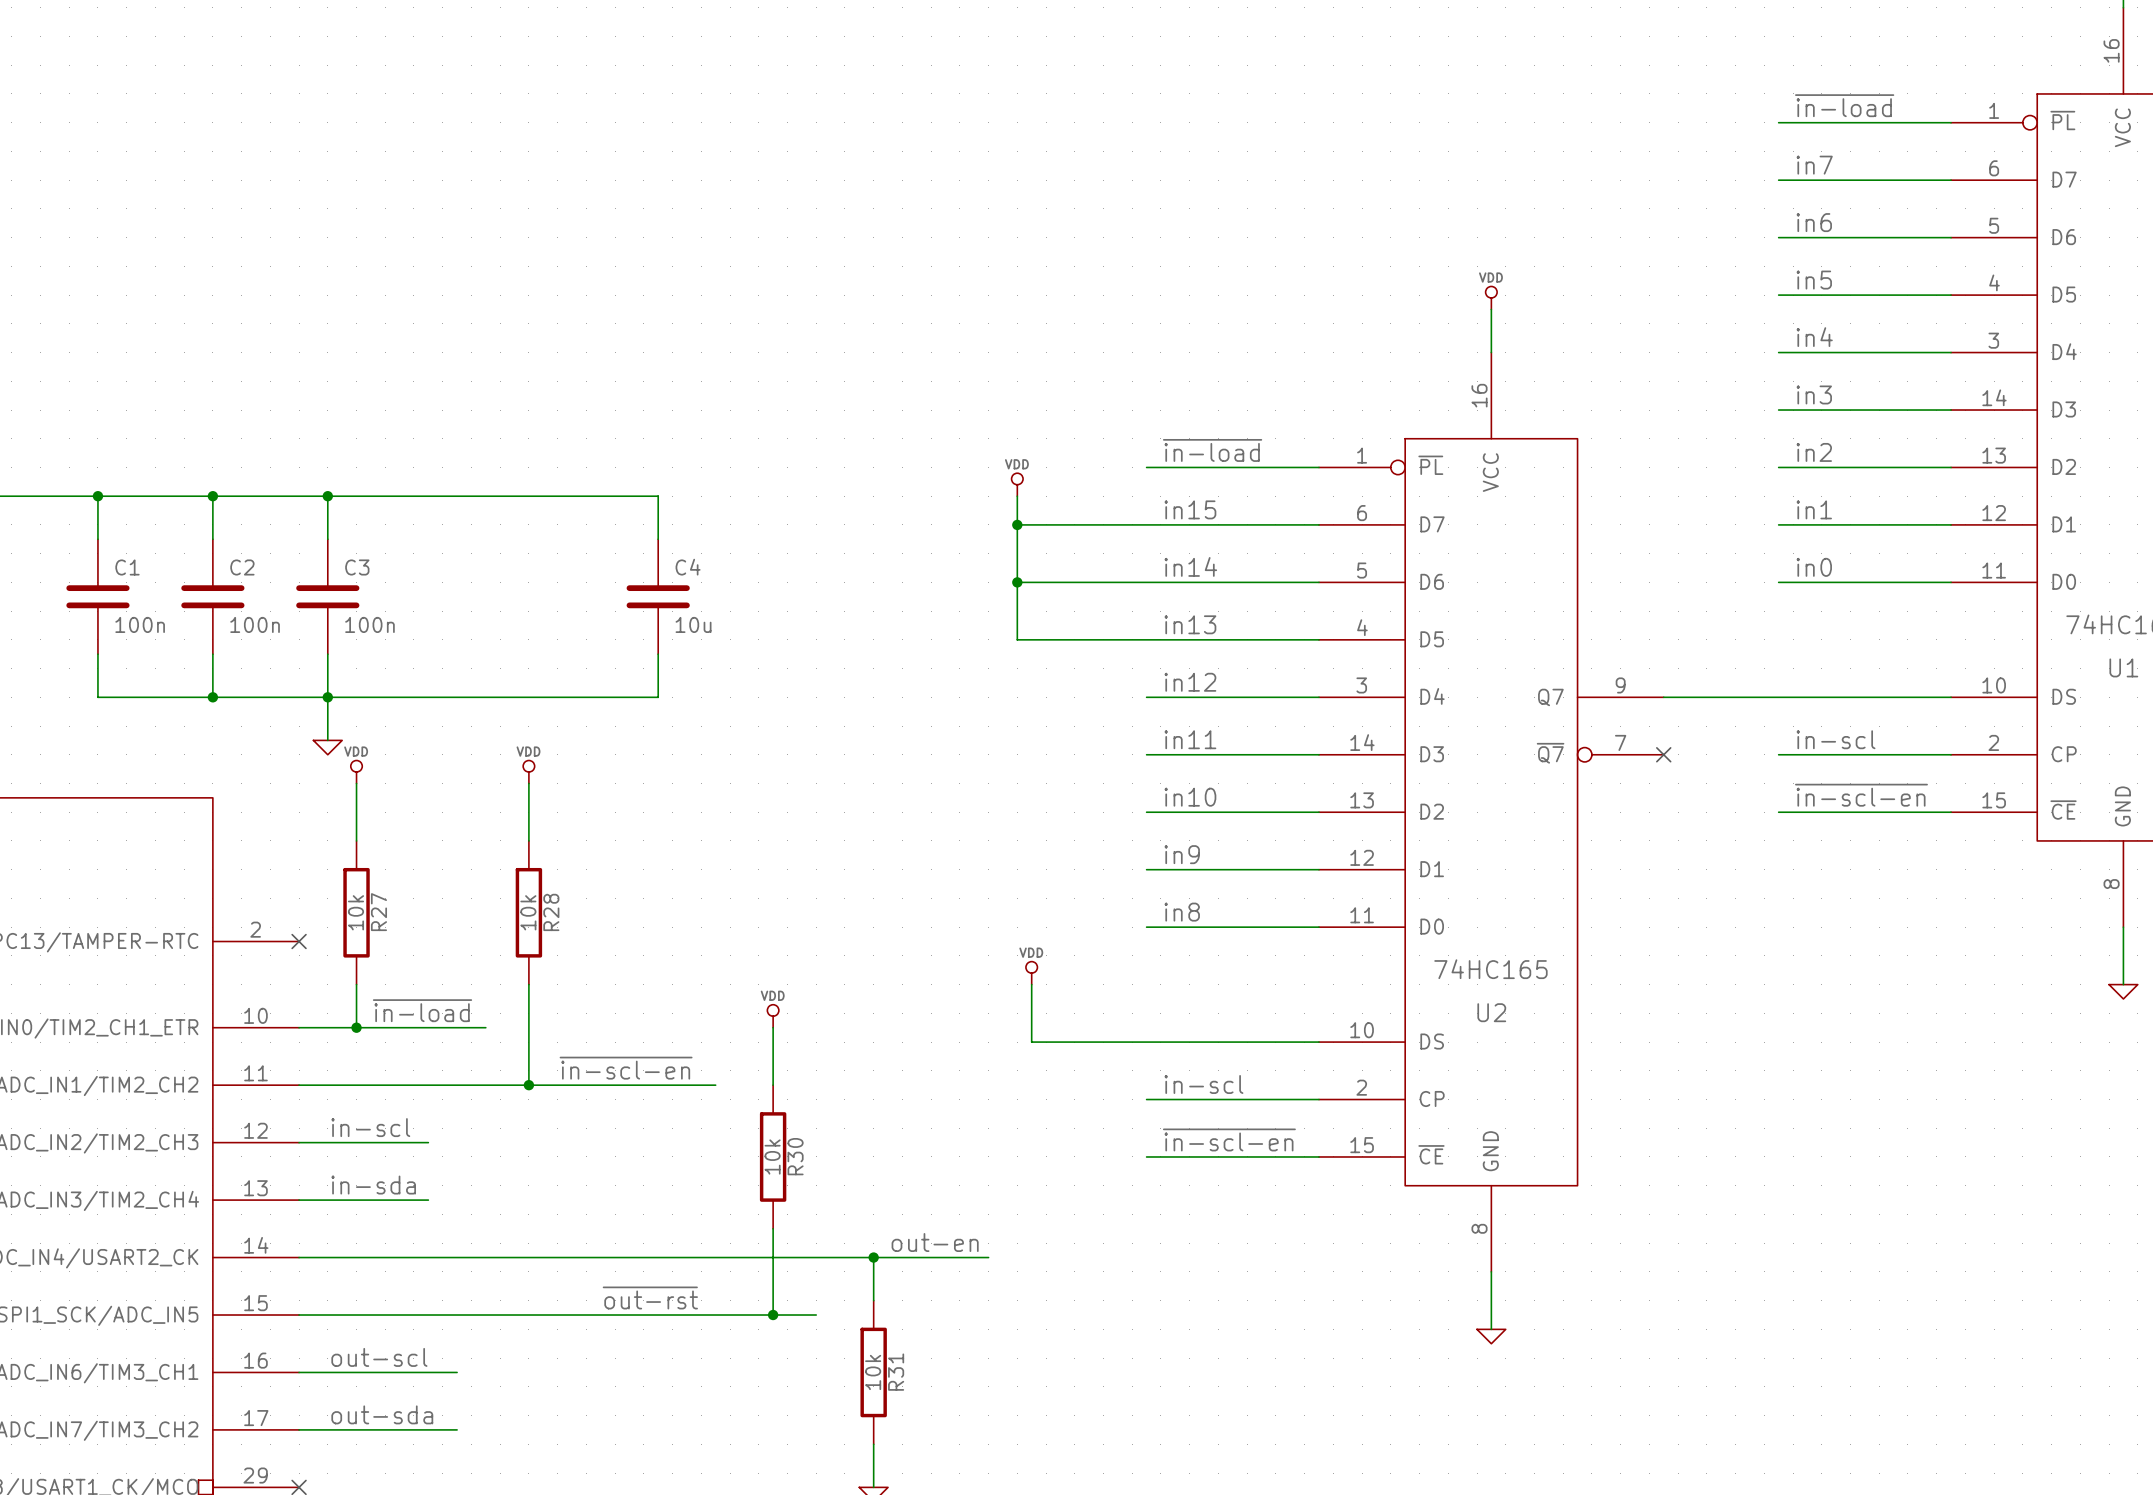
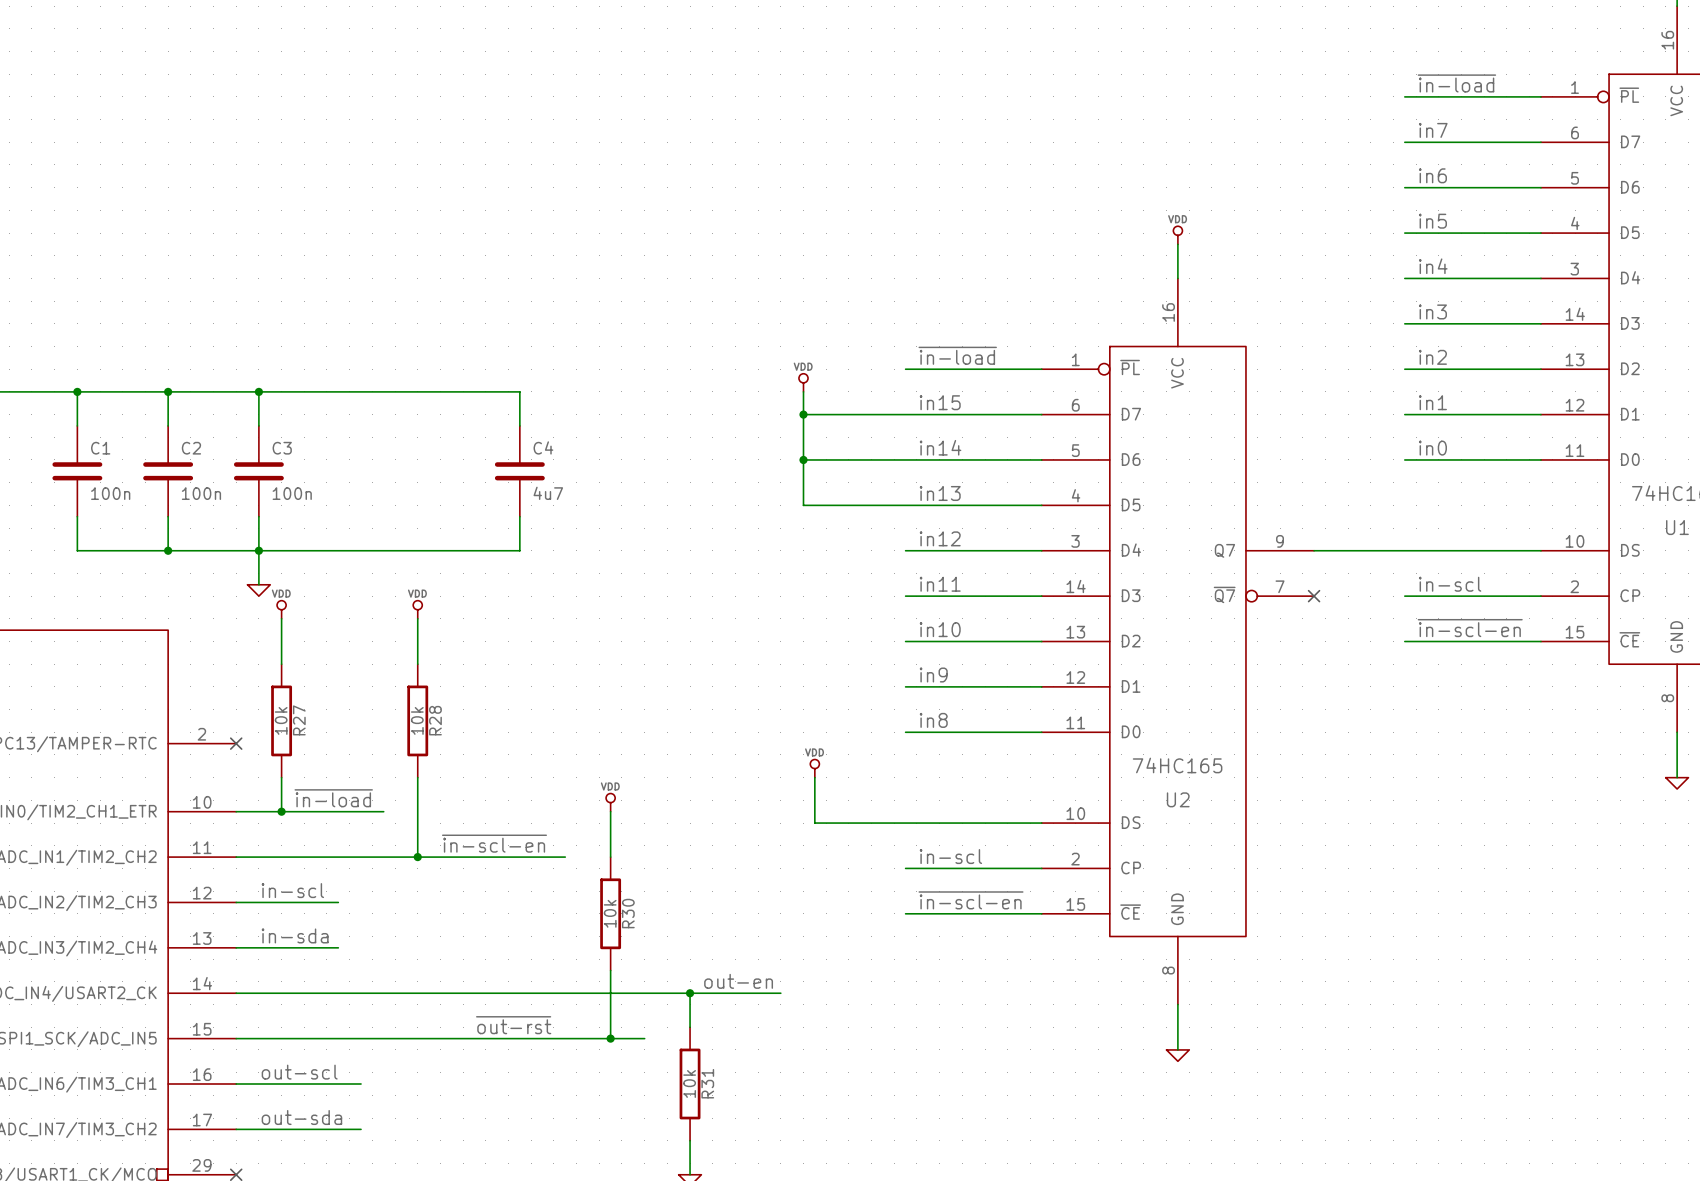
C4 value: 10u (693, 624) -> 4u7 (548, 493)

